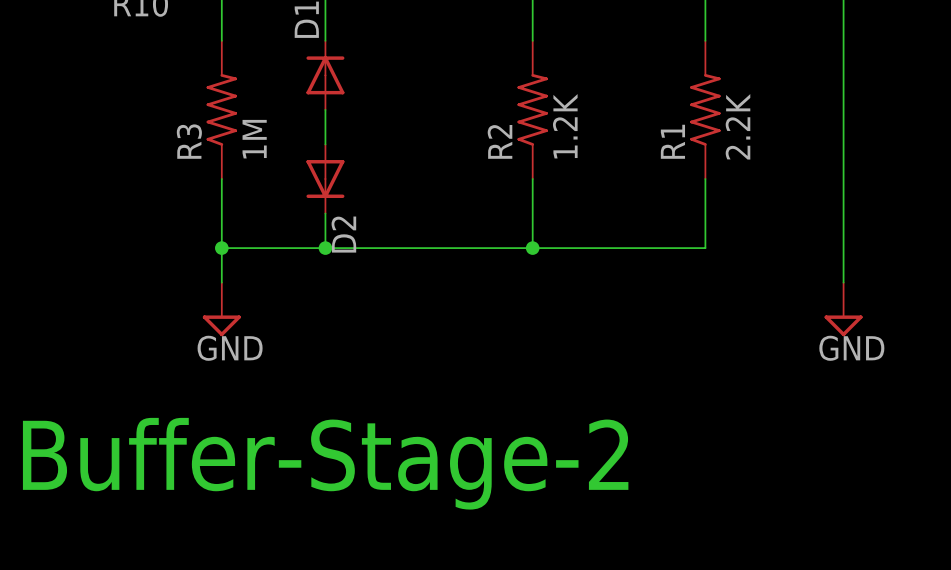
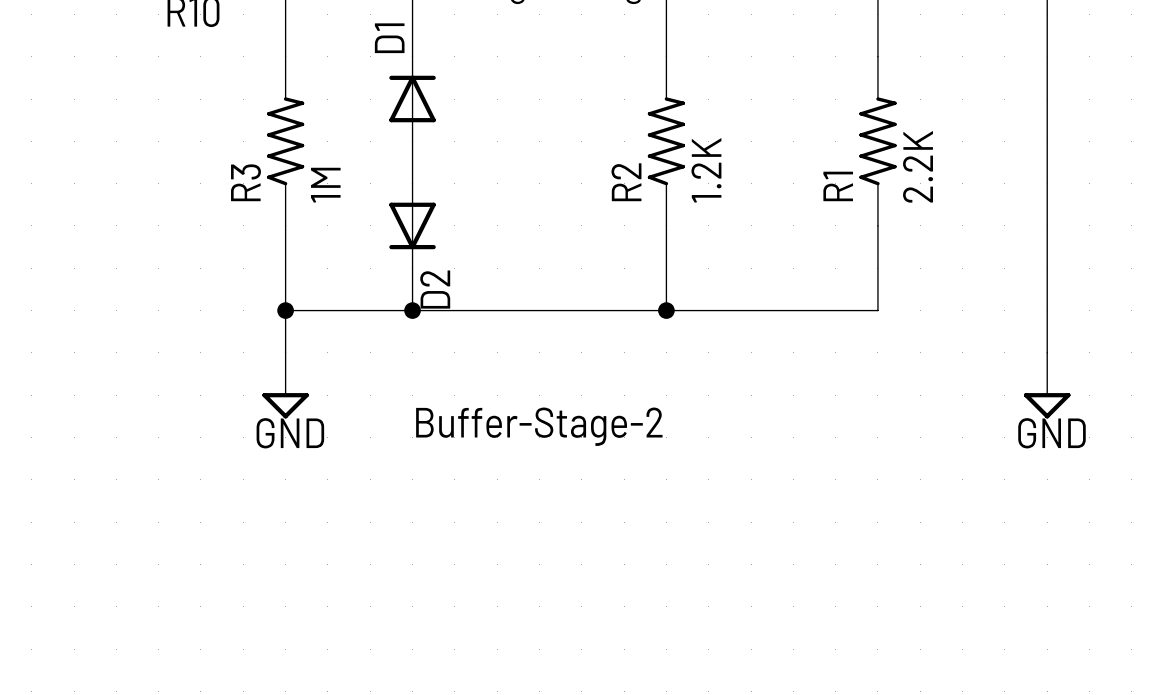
text: none -> Buffer-Stage-2 (539, 426)
text: Buffer-Stage-2 (325, 463) -> none

